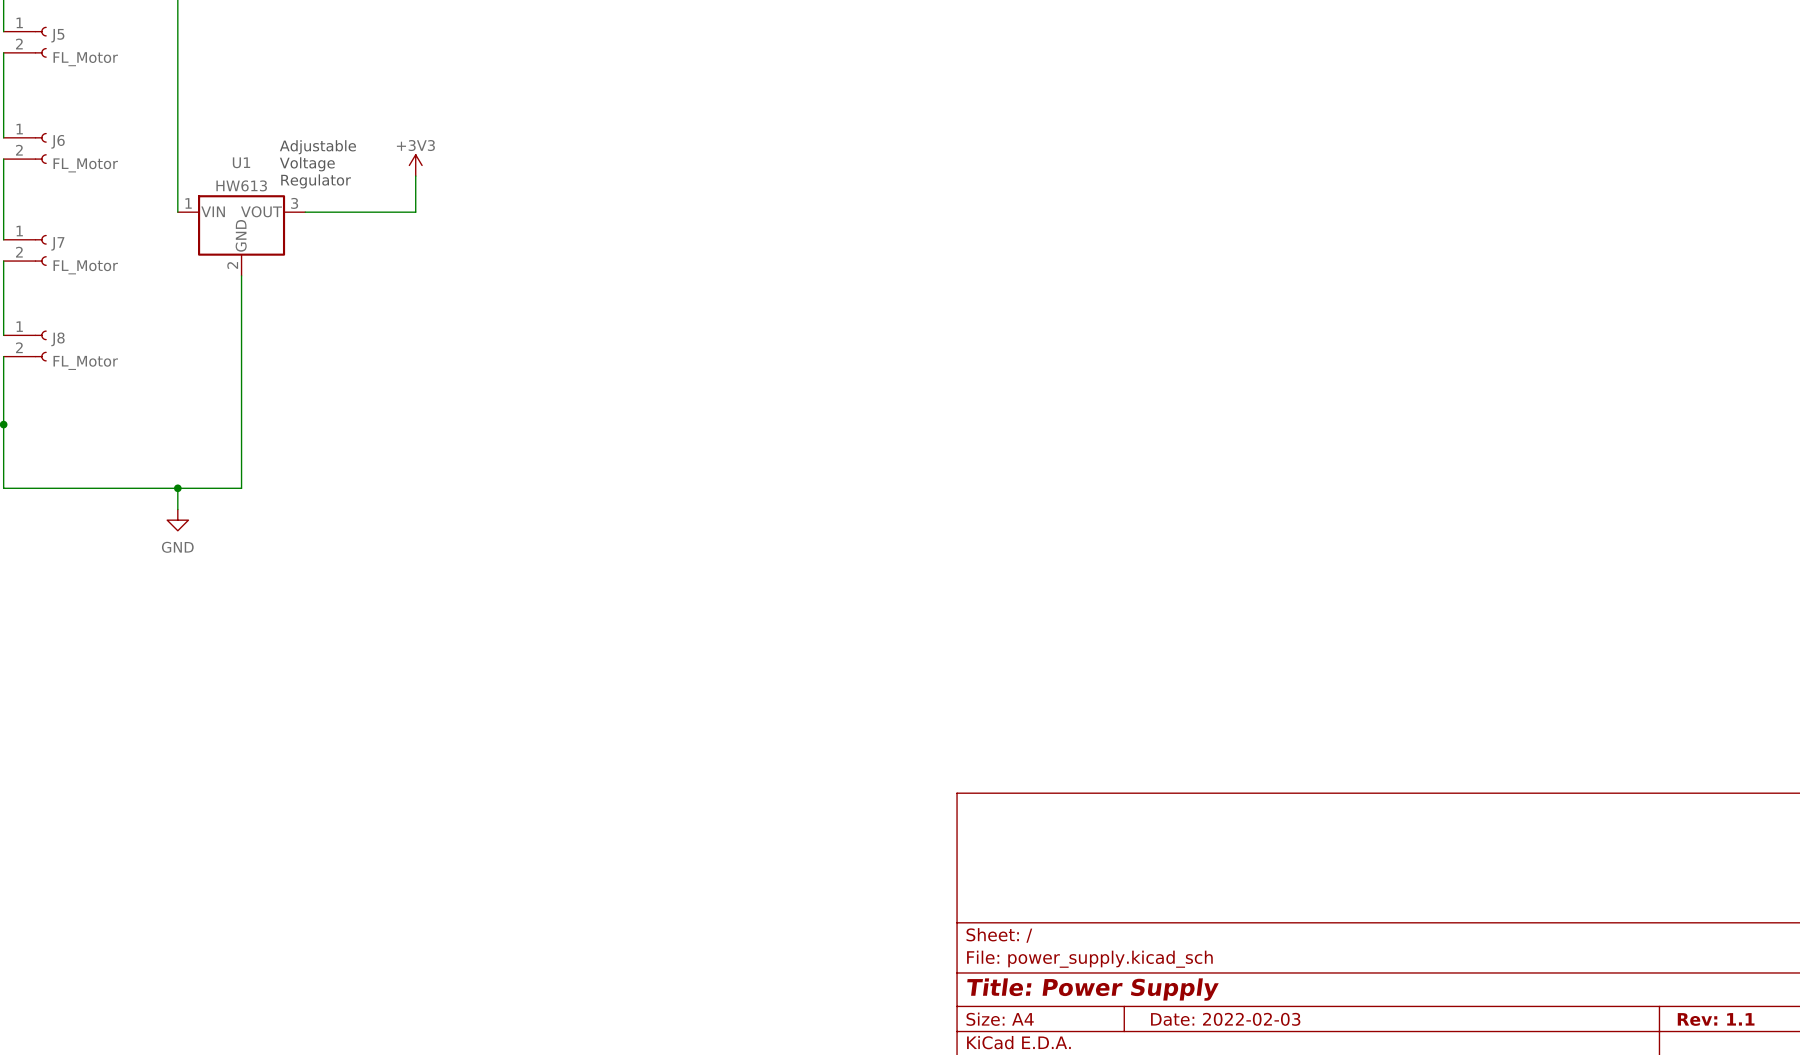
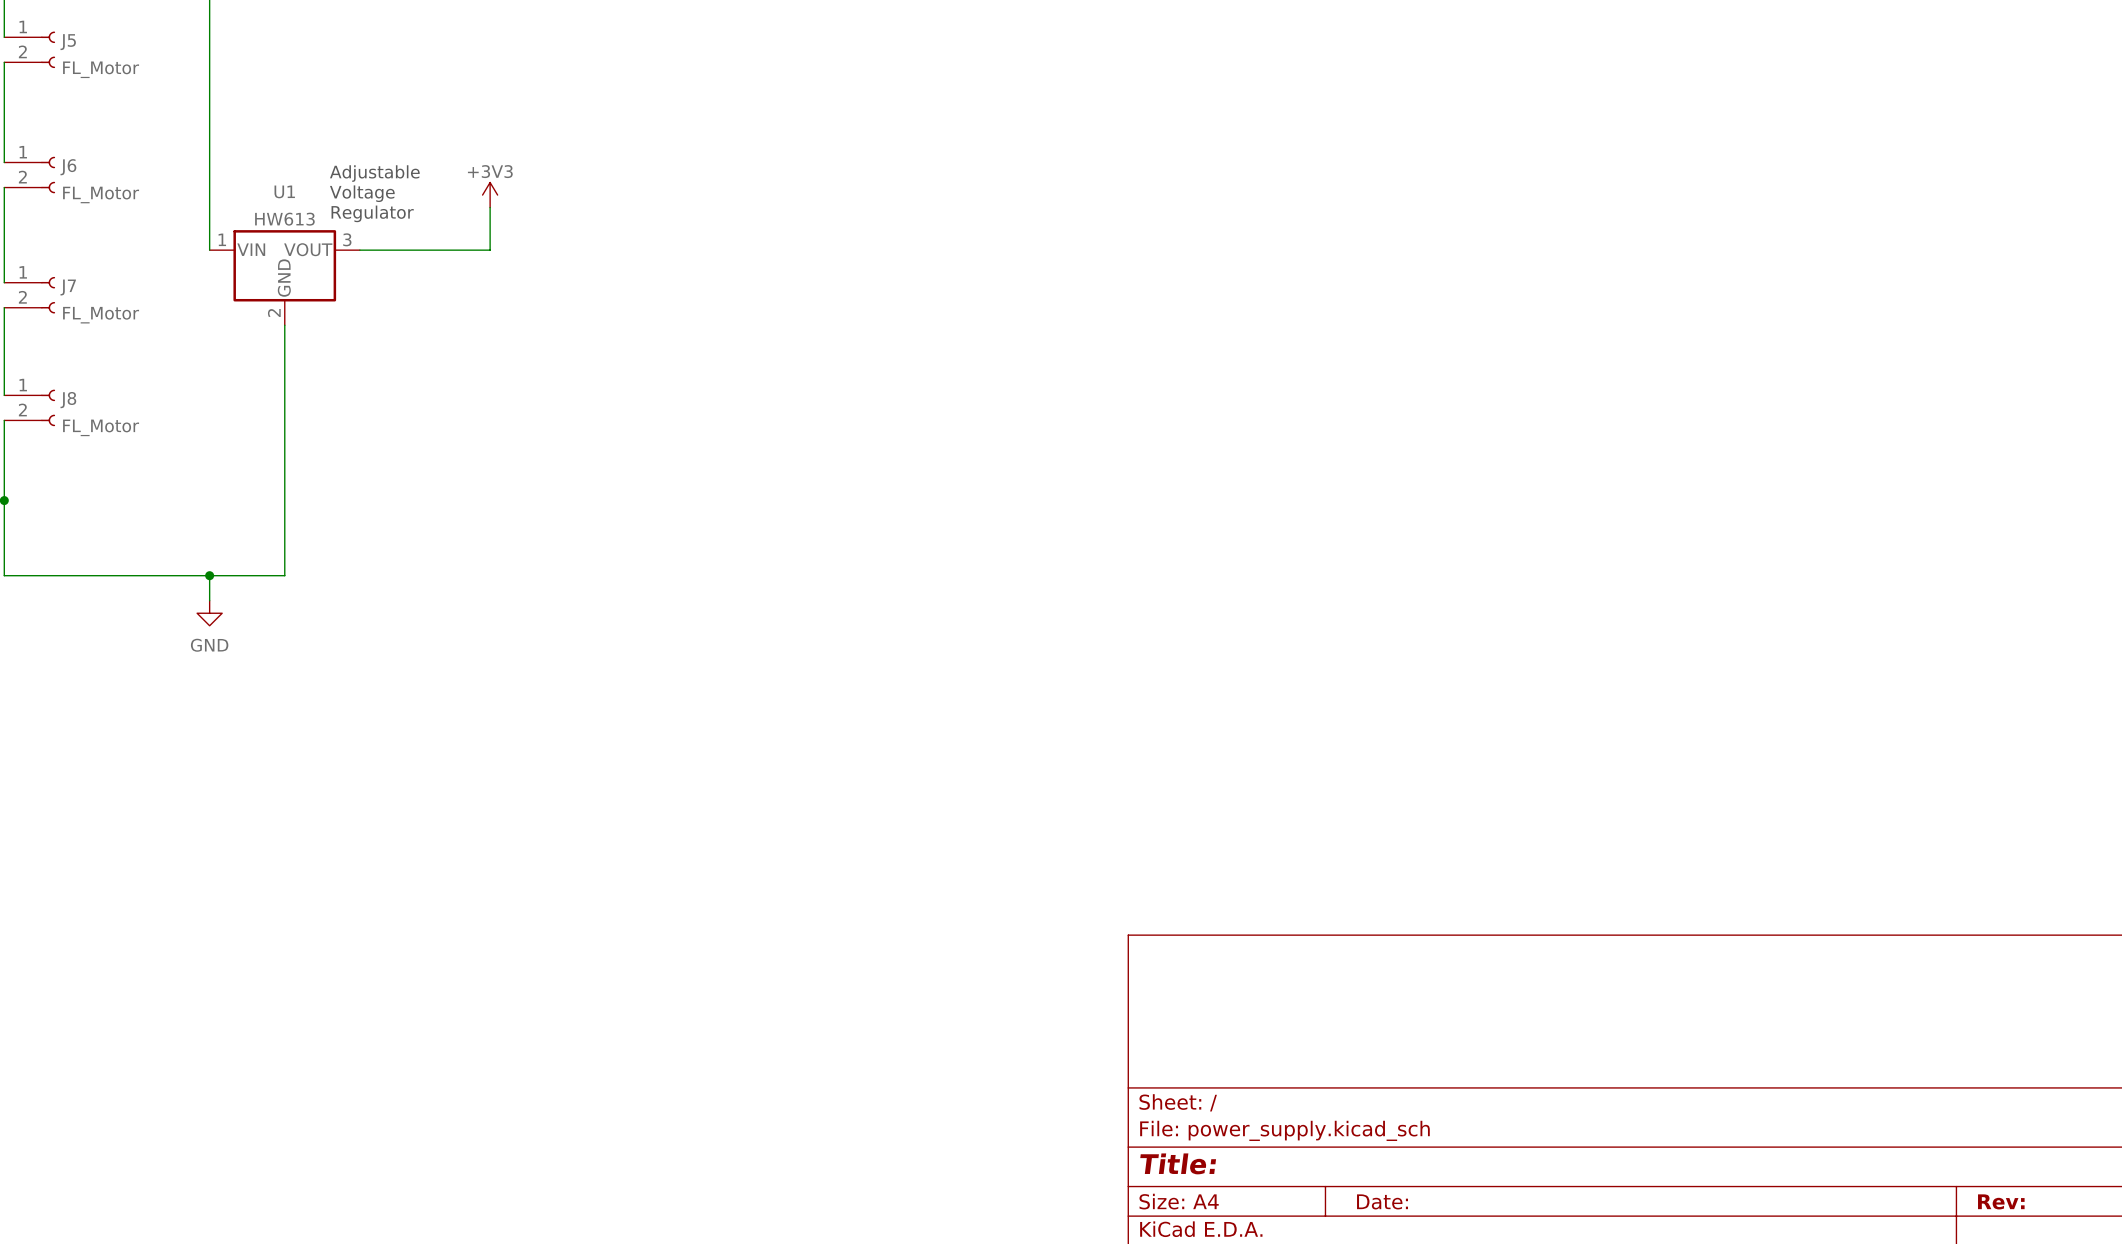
title block: Title: Power Supply (1092, 989) -> Title: (1178, 1163)
title block: Date: 2022-02-03 (1225, 1019) -> Date: (1382, 1201)
title block: Rev: 1.1 (1716, 1019) -> Rev: (2001, 1201)

